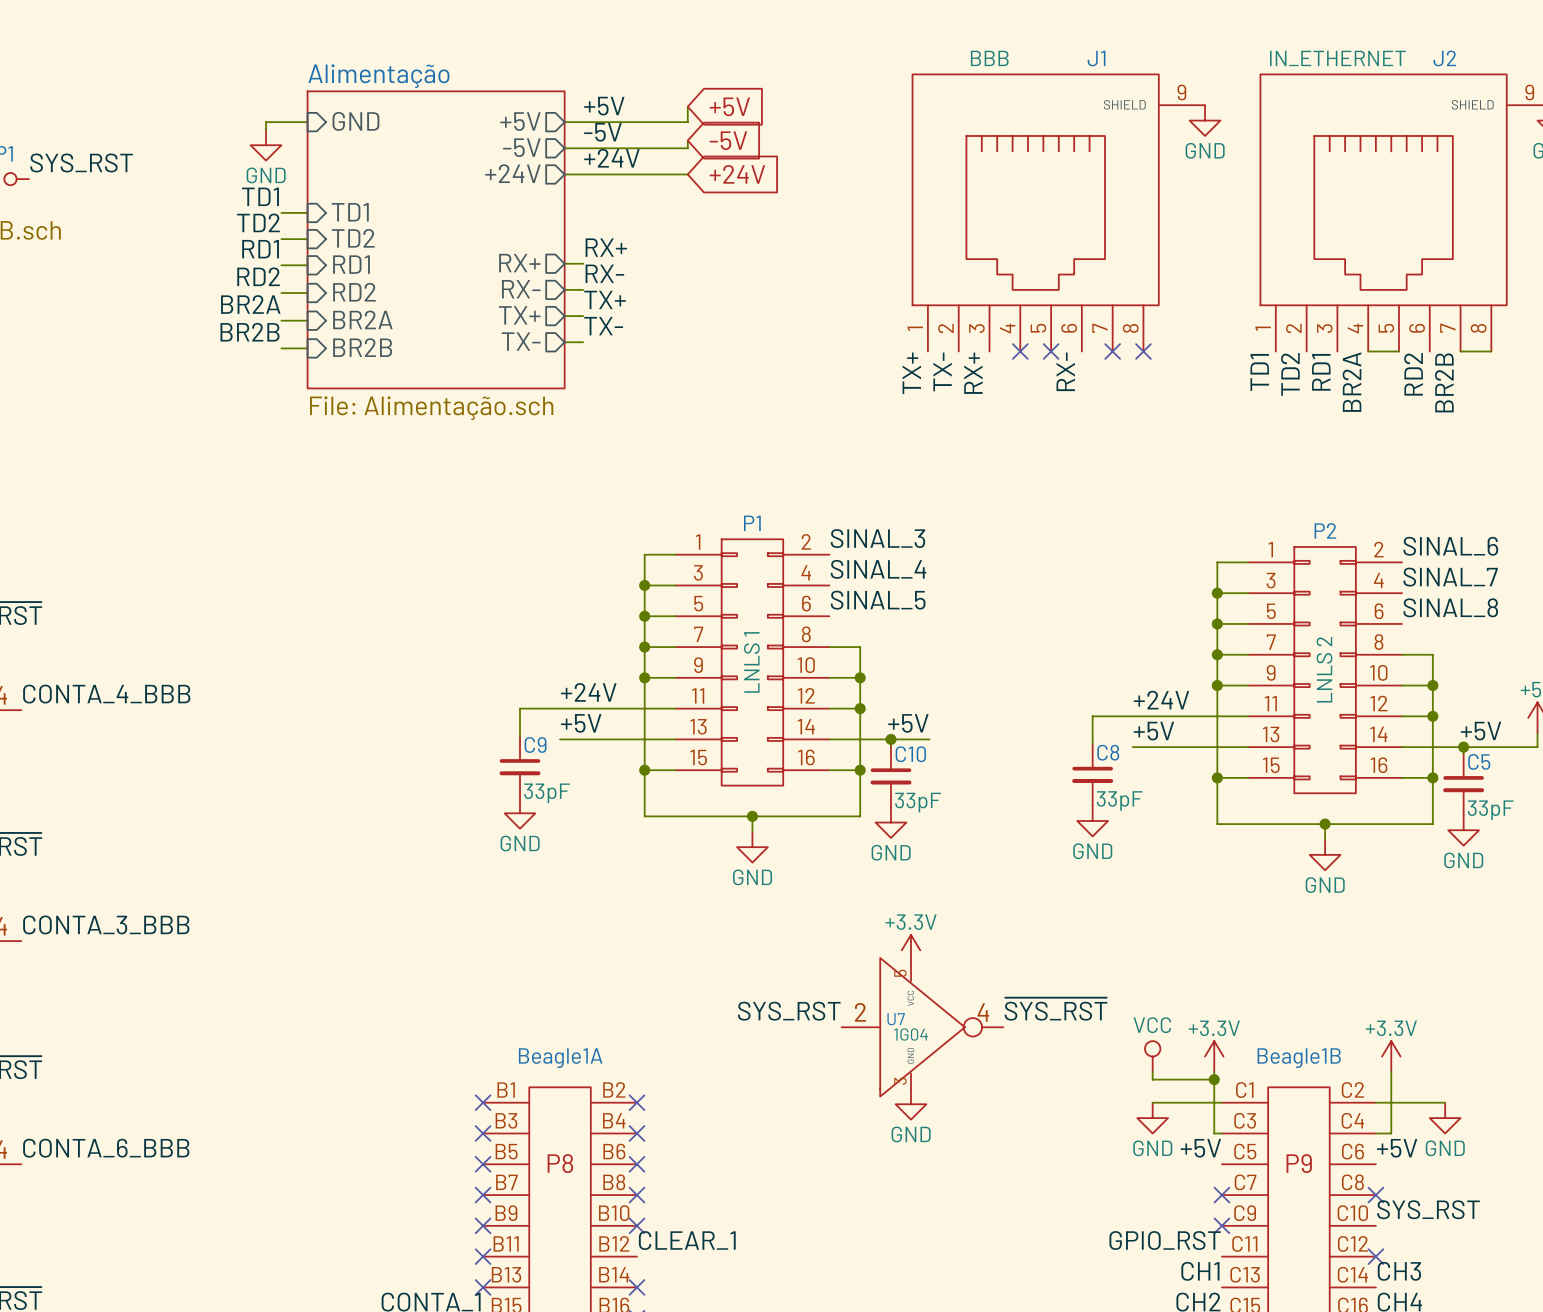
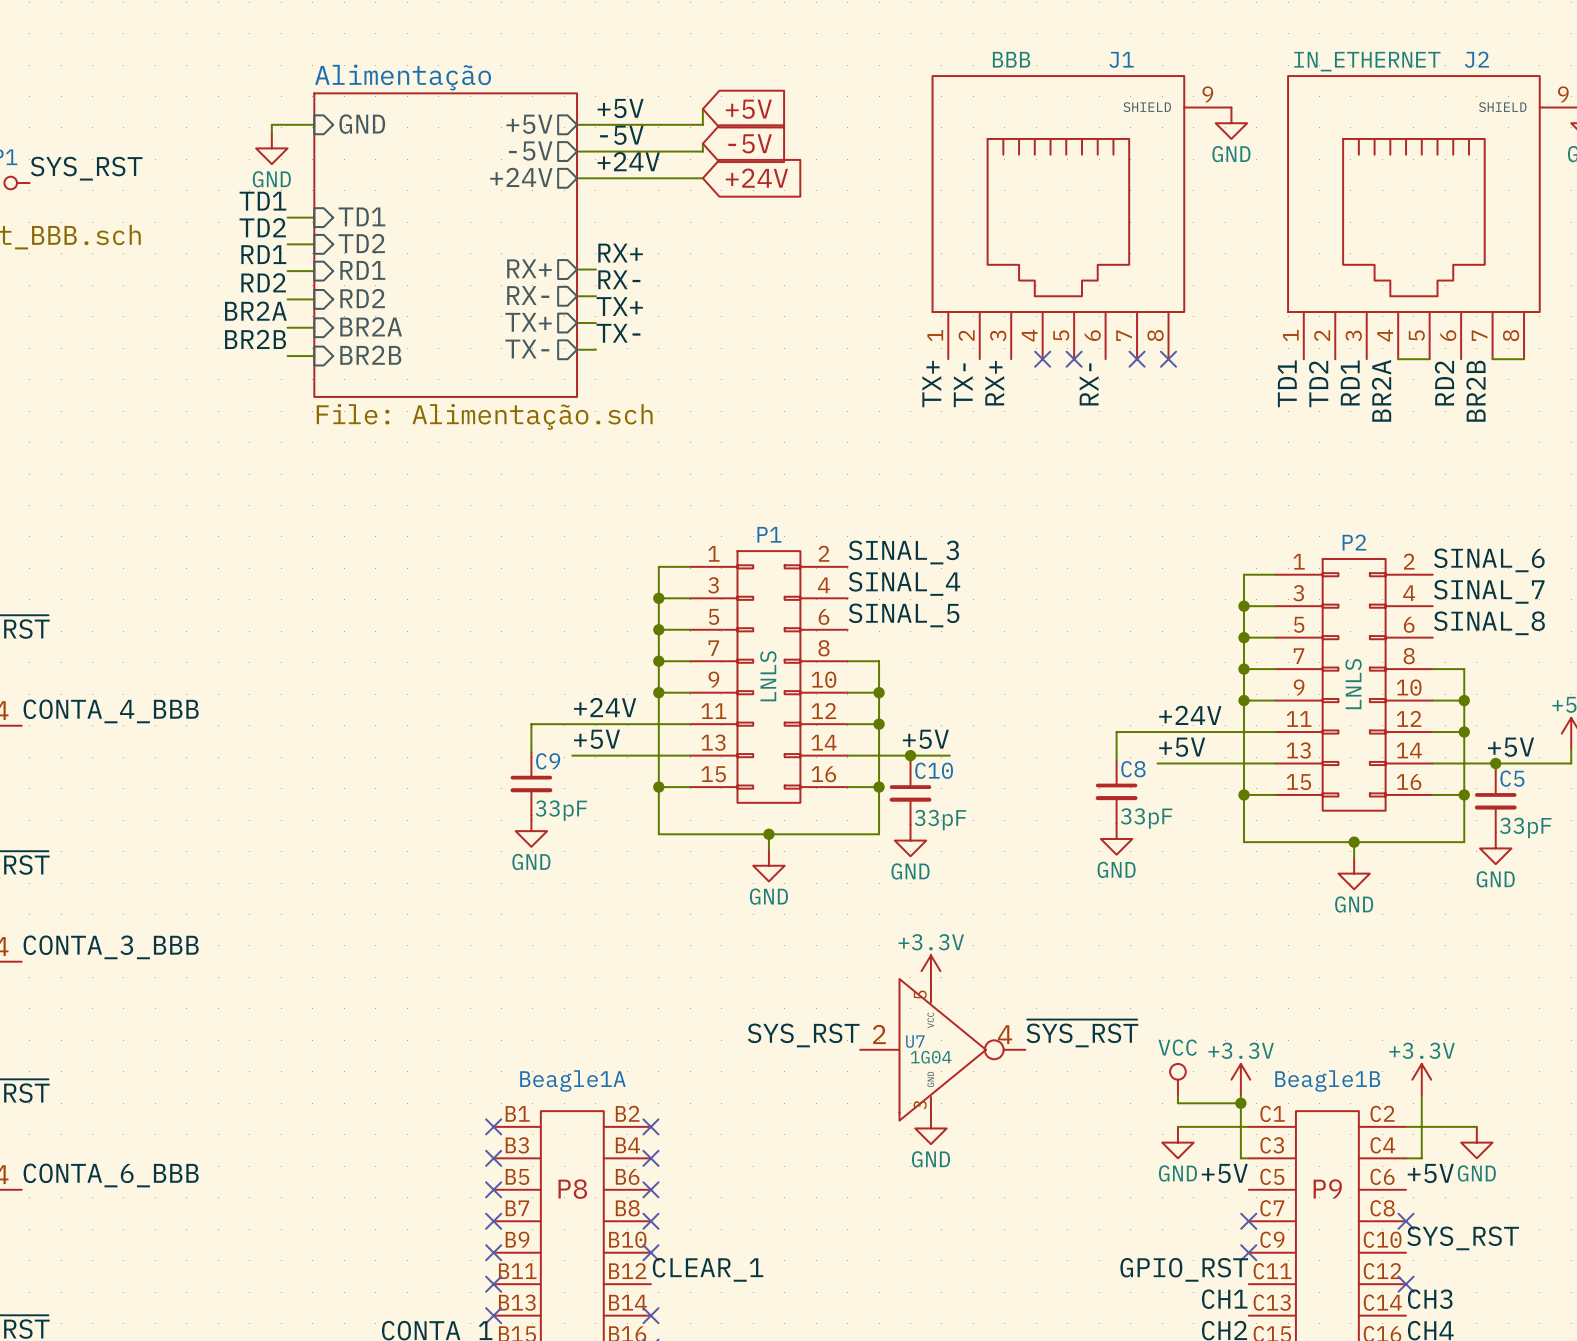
P1 value: LNLS 1 (751, 662) -> LNLS (768, 676)
P2 value: LNLS 2 (1324, 669) -> LNLS (1353, 684)

